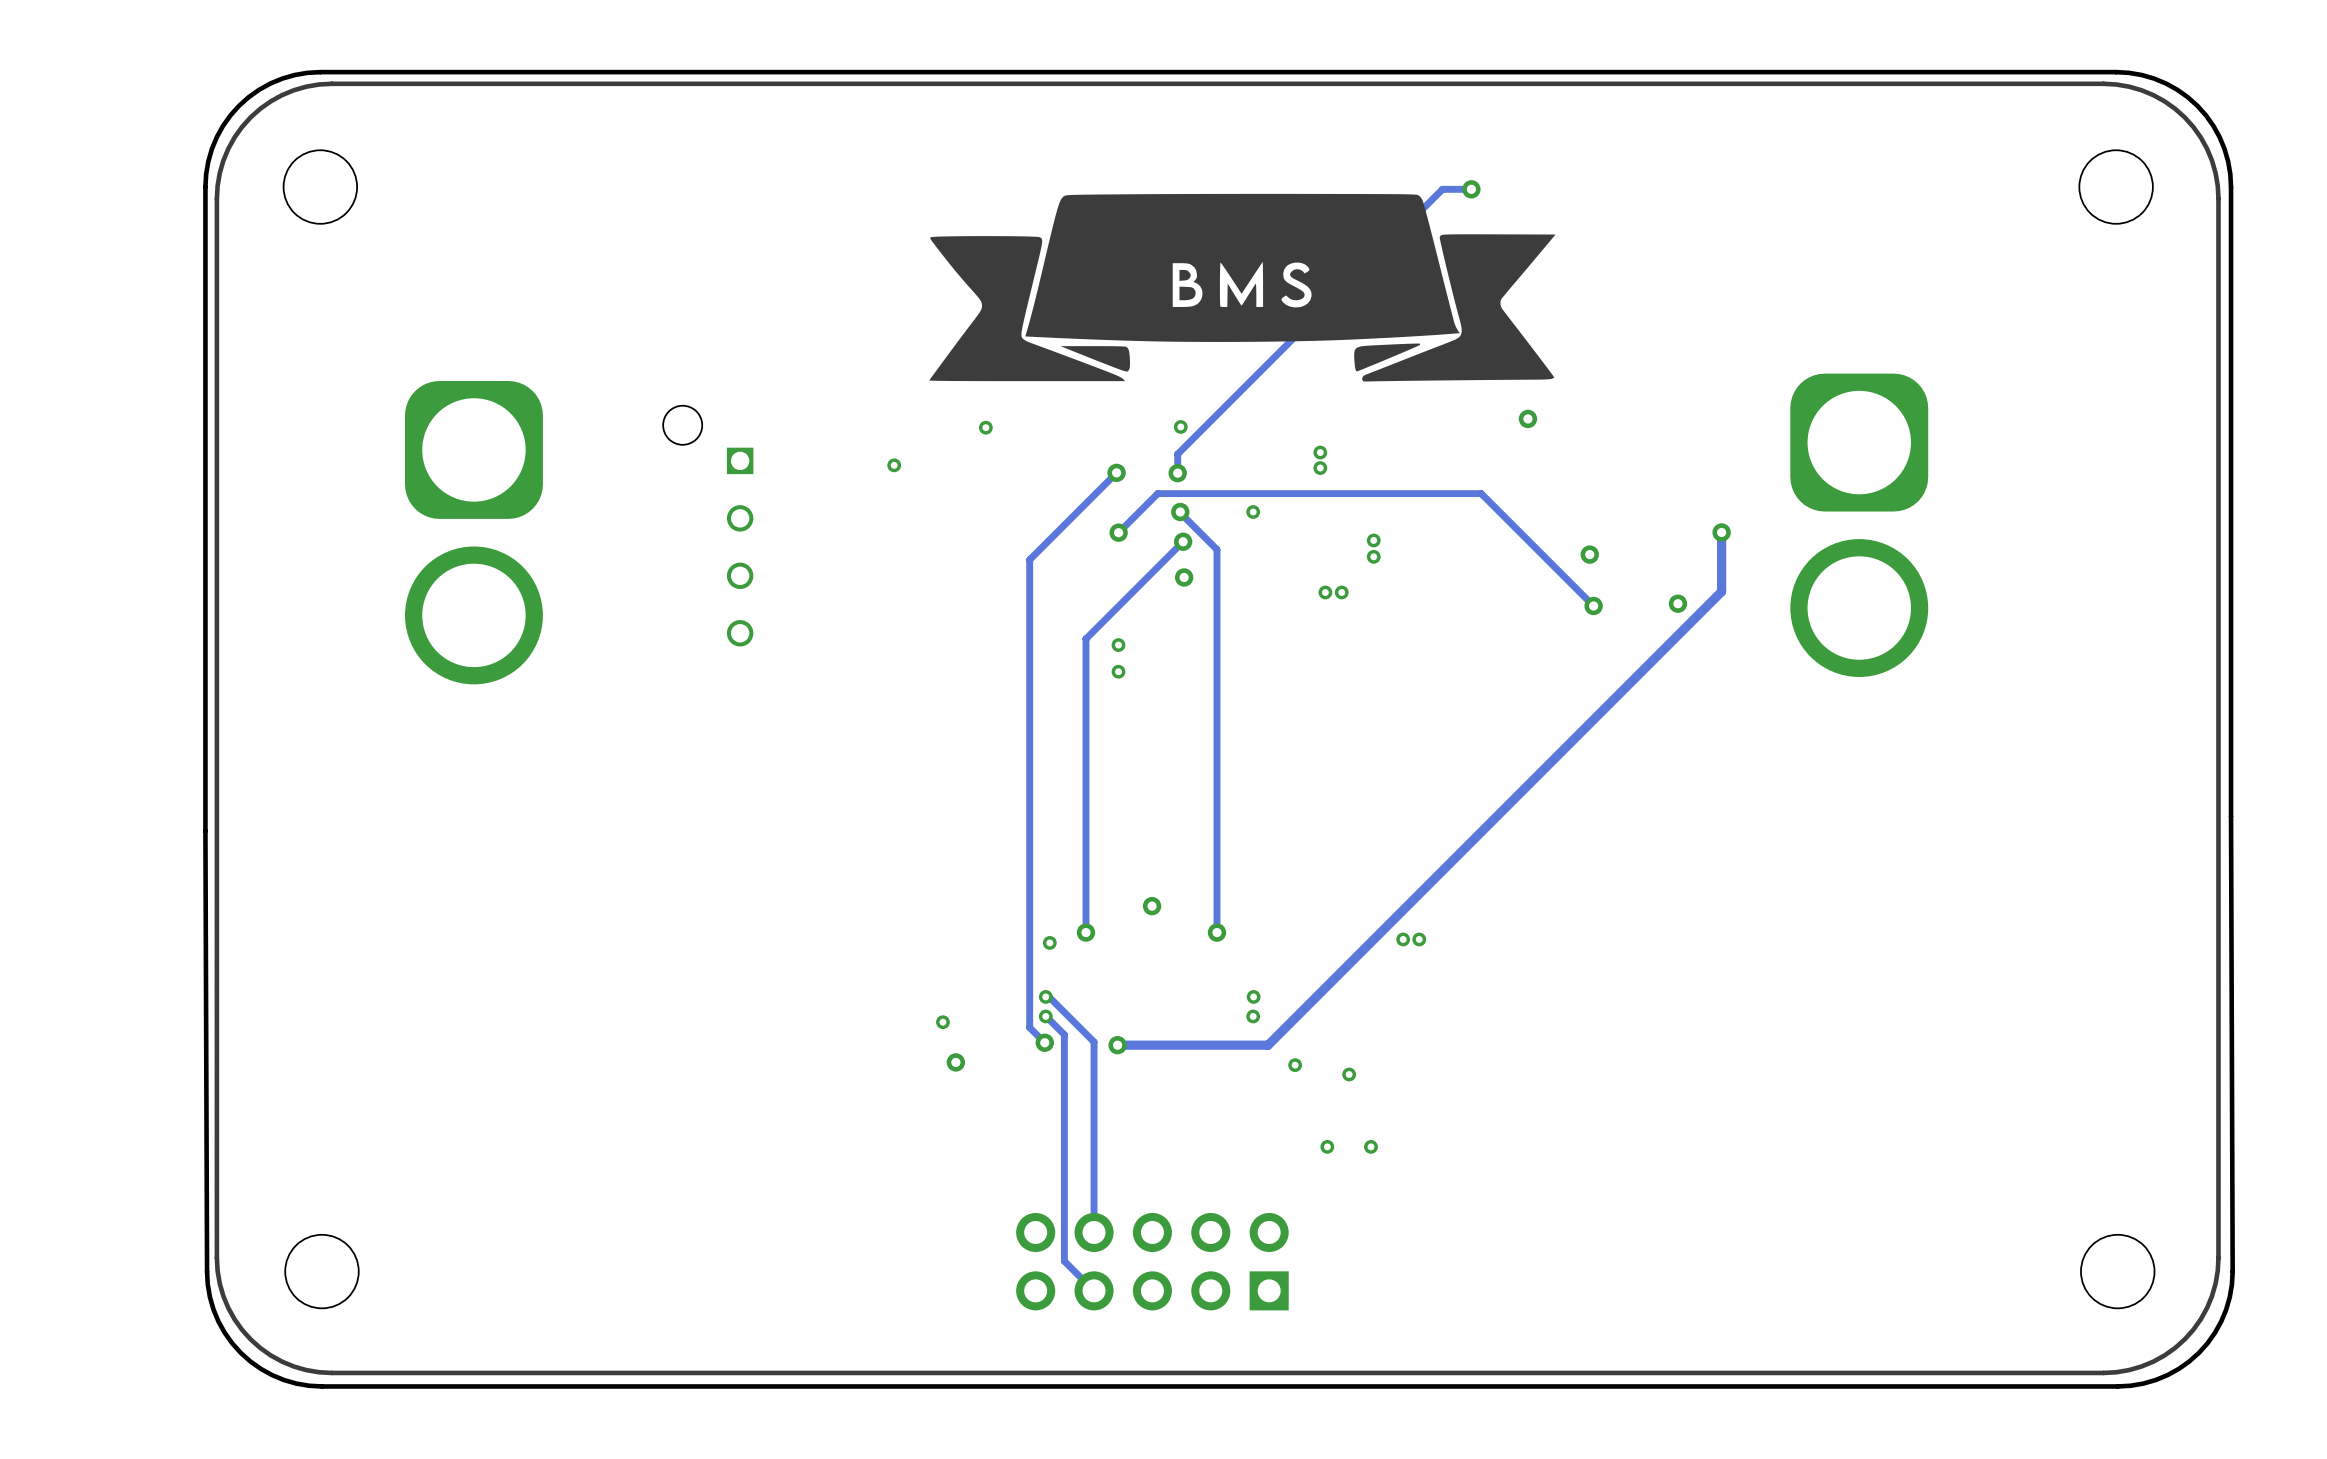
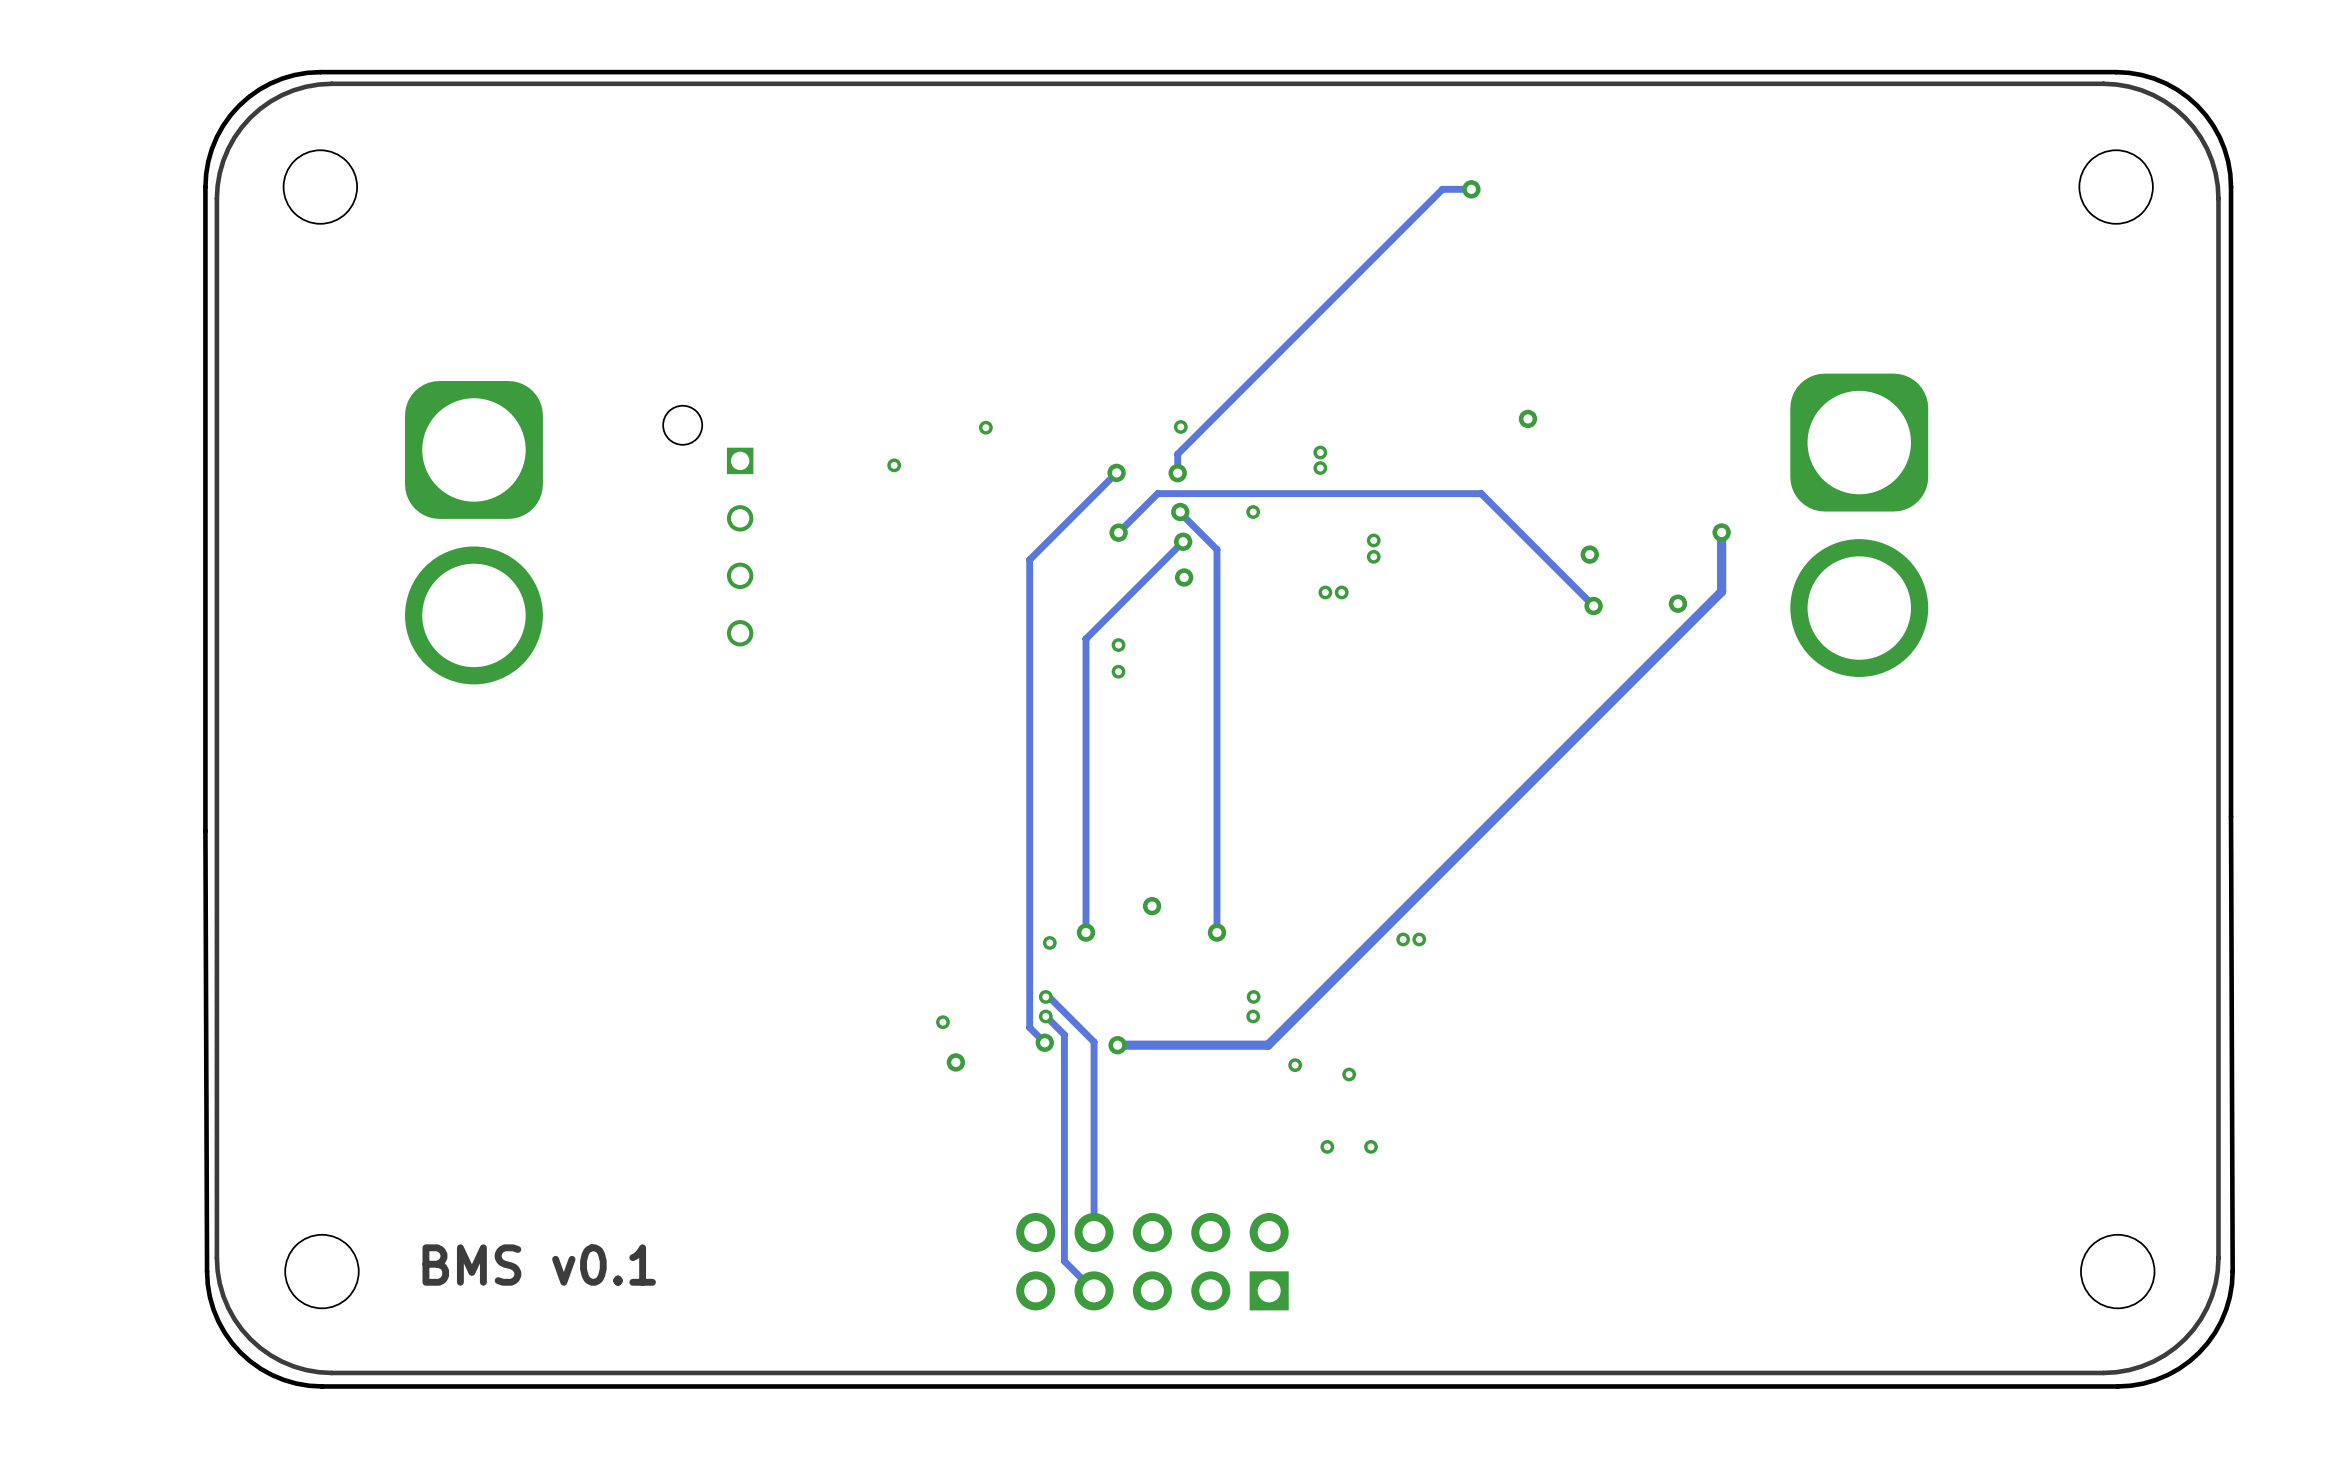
drawing: [929, 193, 1556, 382] -> none
text: none -> BMS v0.1 (539, 1265)

